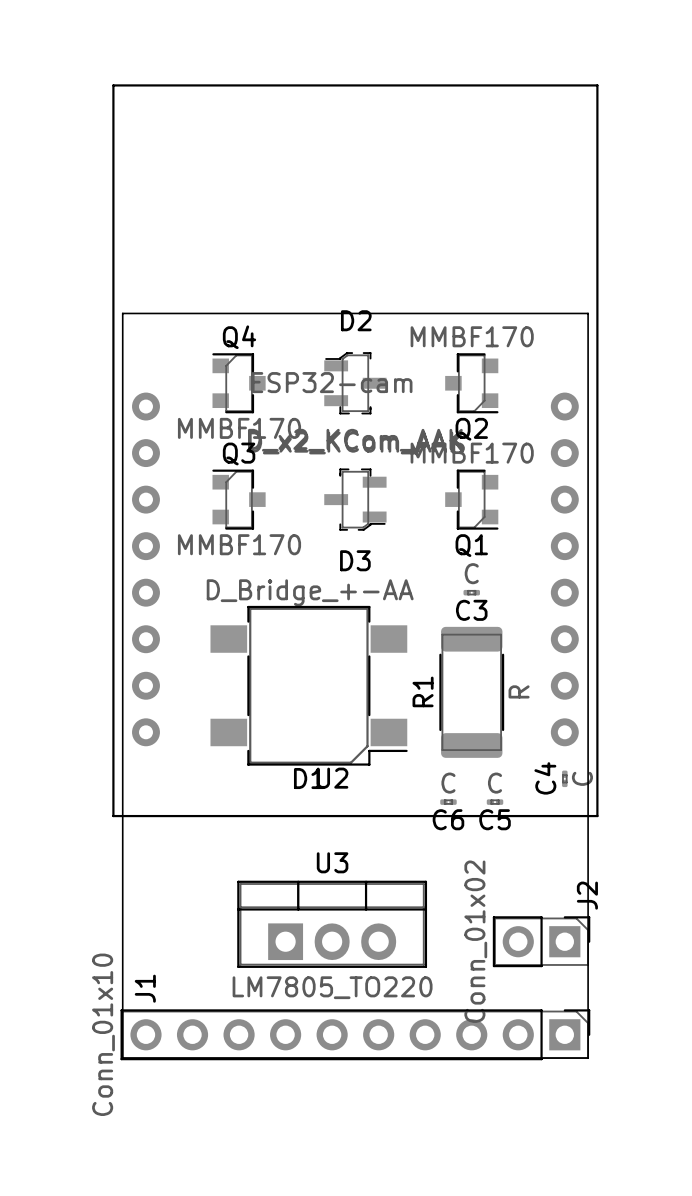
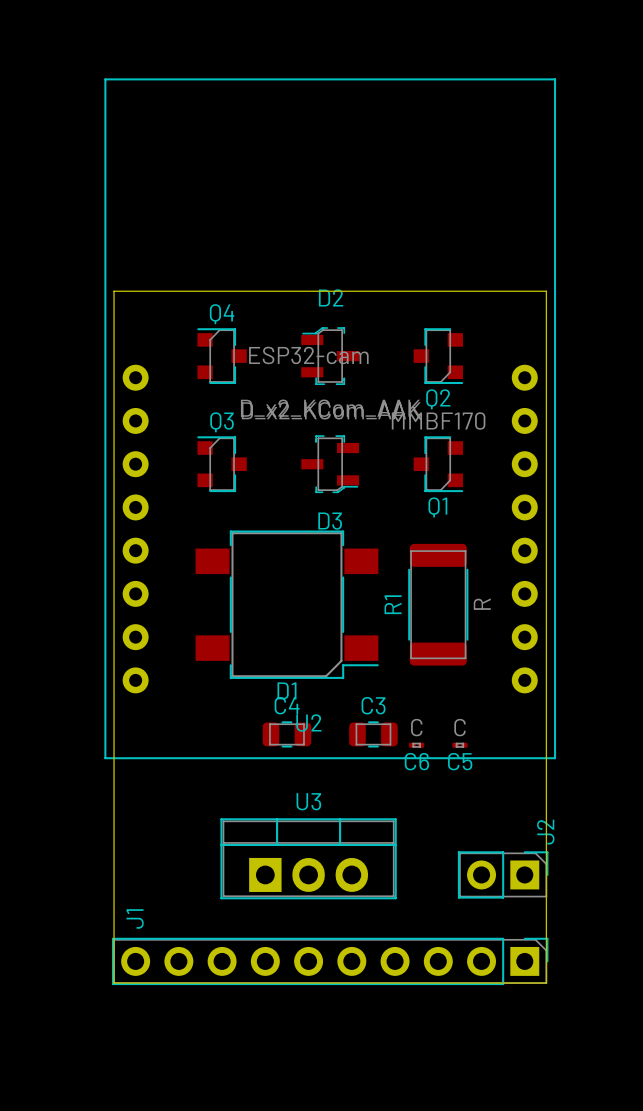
Q2 value: MMBF170 (472, 336) -> none
Q4 value: MMBF170 (239, 428) -> none
Q3 value: MMBF170 (239, 544) -> none
C3 value: C (471, 573) -> none
C3 footprint: [463, 589, 480, 596] -> [349, 721, 398, 748]
D1 value: D_Bridge_+-AA (310, 592) -> none
C3 name position: C3 (471, 610) -> C3 (373, 705)
D1 position: (309, 685) -> (287, 604)
R1 position: (471, 692) -> (438, 604)
C4 footprint: [562, 770, 568, 788] -> [262, 721, 312, 748]
C4 value: C (582, 778) -> none
J2 value: Conn_01x02 (475, 941) -> none
U3 value: LM7805_TO220 (332, 987) -> none
J1 value: Conn_01x10 (103, 1034) -> none

